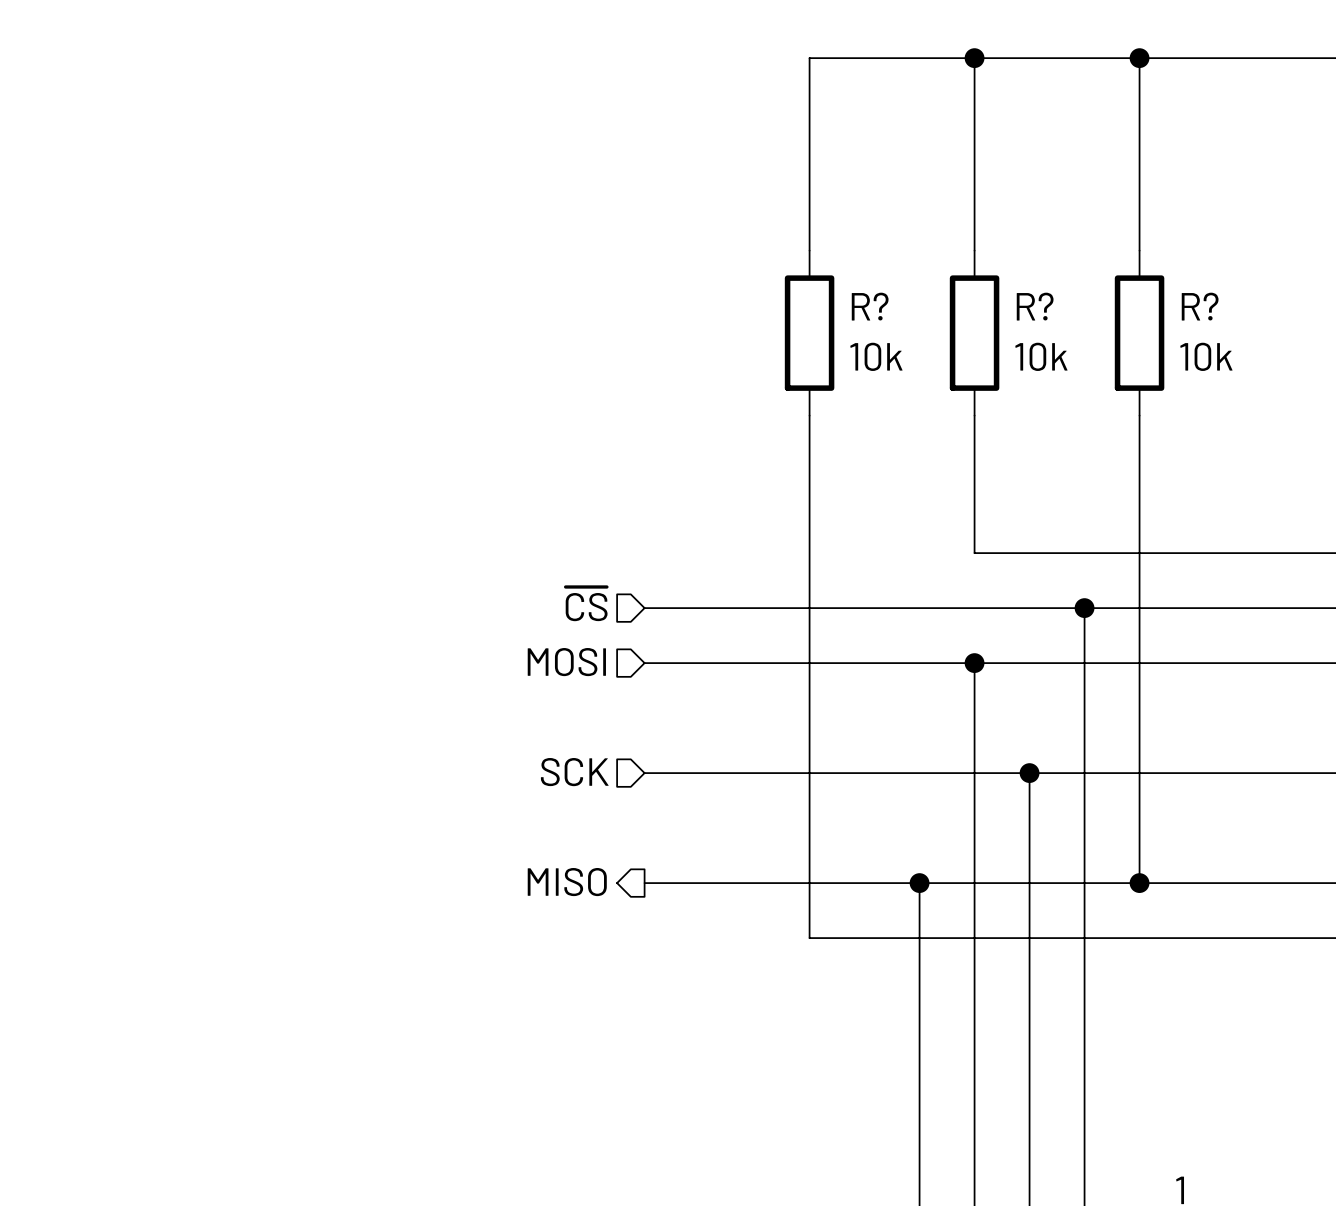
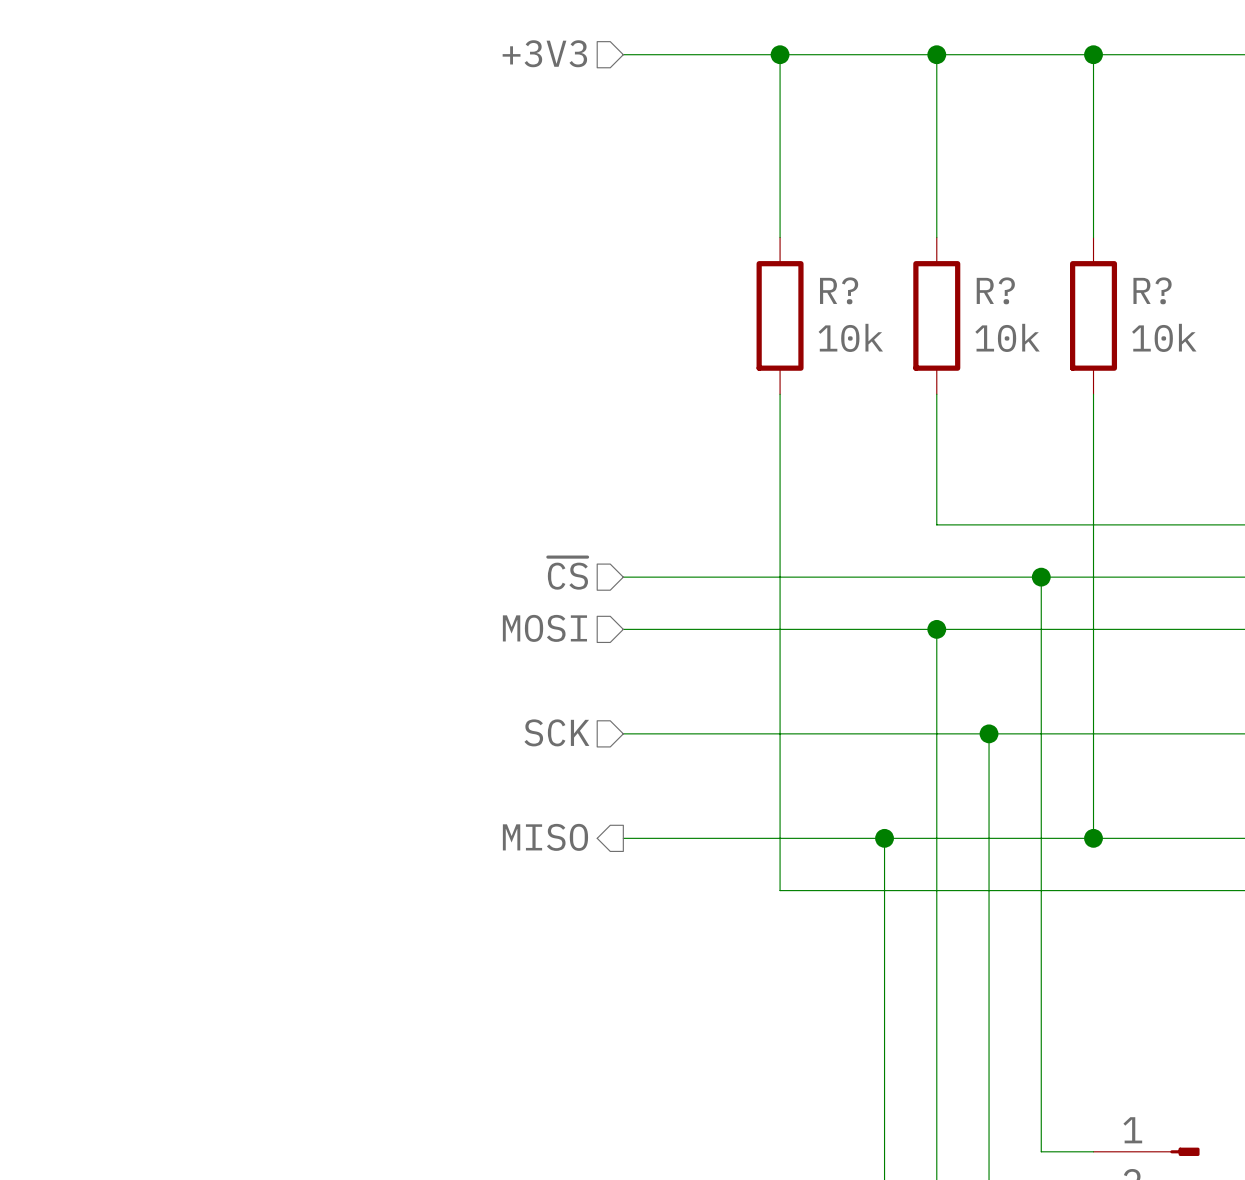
hierarchical label: none -> +3V3 (544, 53)
wire: none -> (623, 54) (780, 54)
junction: none -> (780, 54)

